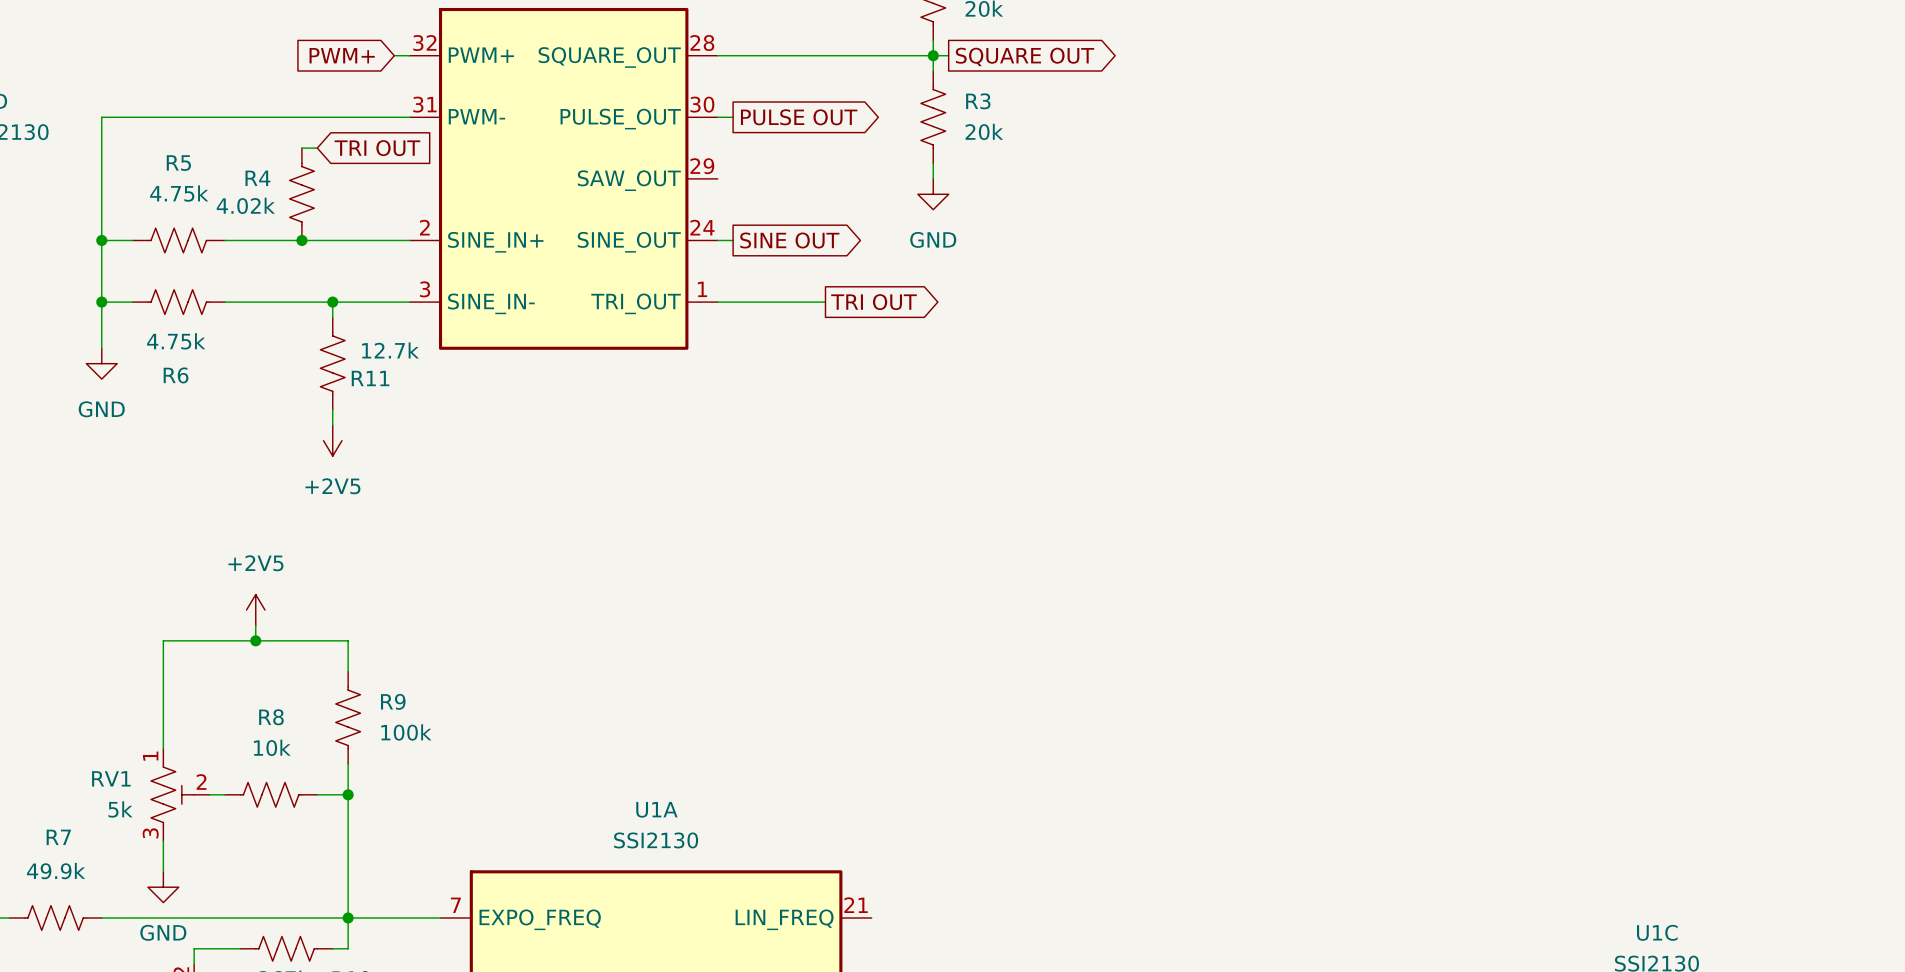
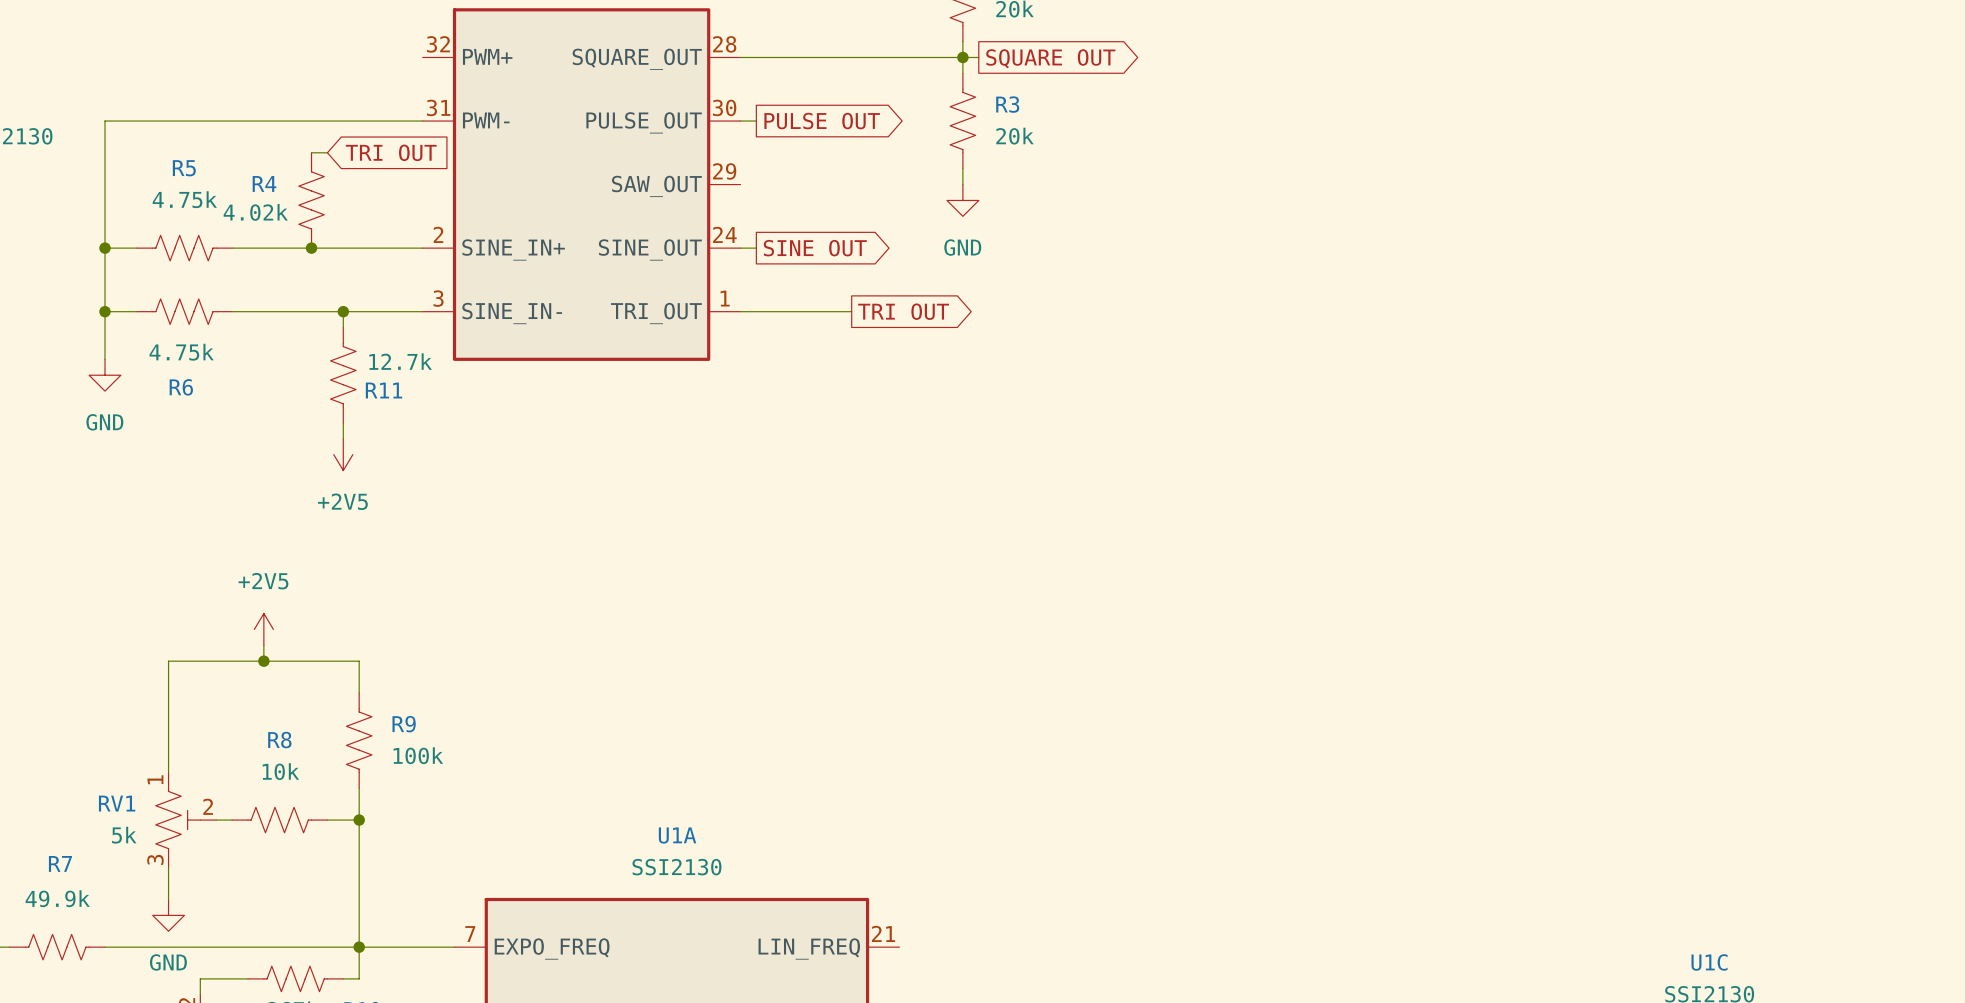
global label: PWM+ (342, 55) -> none
wire: (394, 55) (409, 55) -> none

